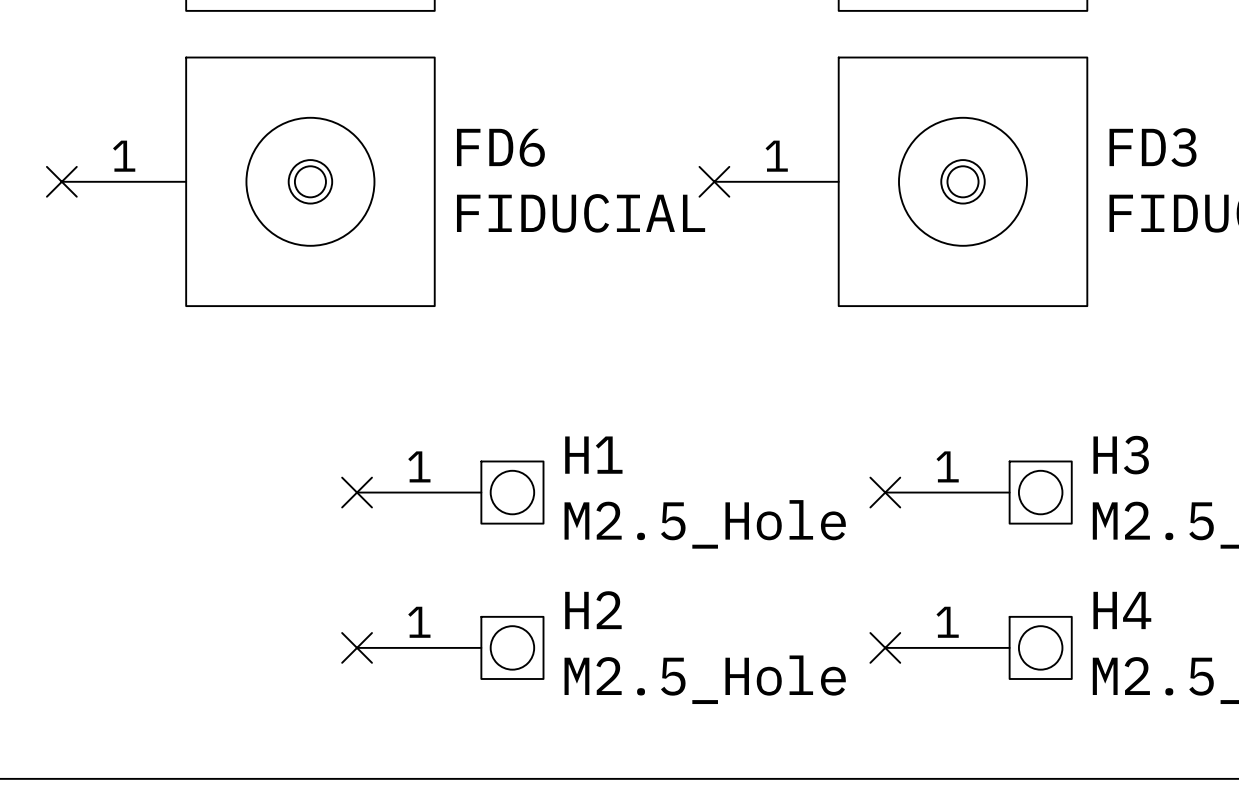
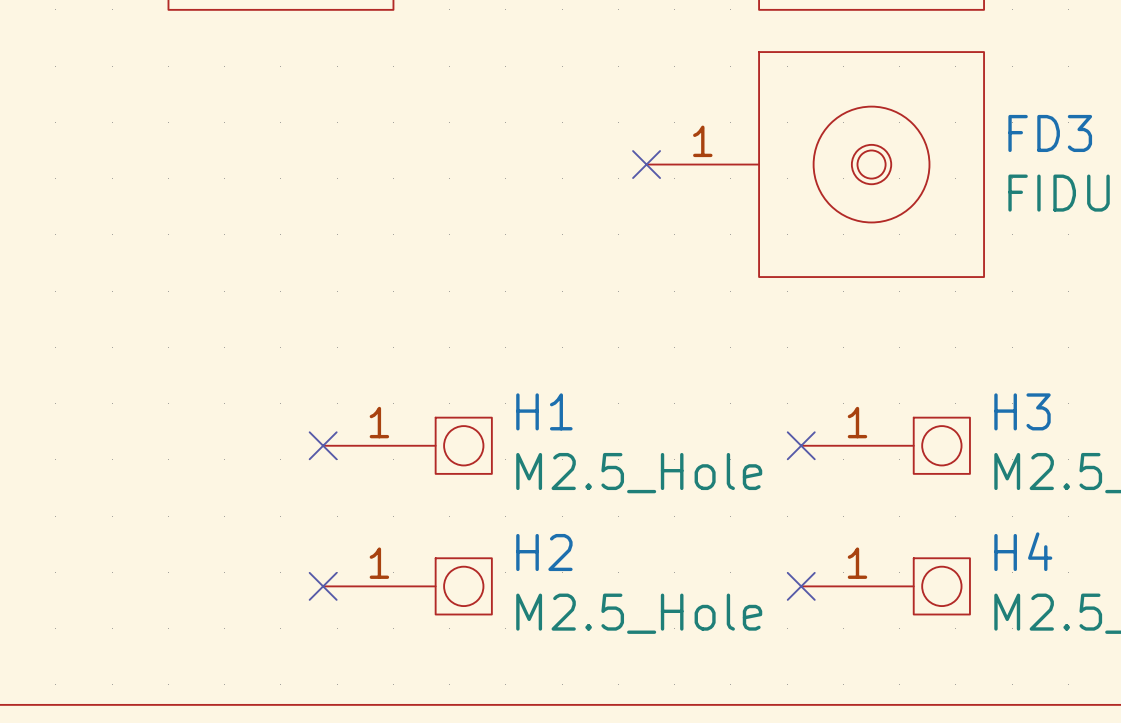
no-connect mark: (61, 181) -> none
FD6: FIDUCIAL (248, 181) -> none

